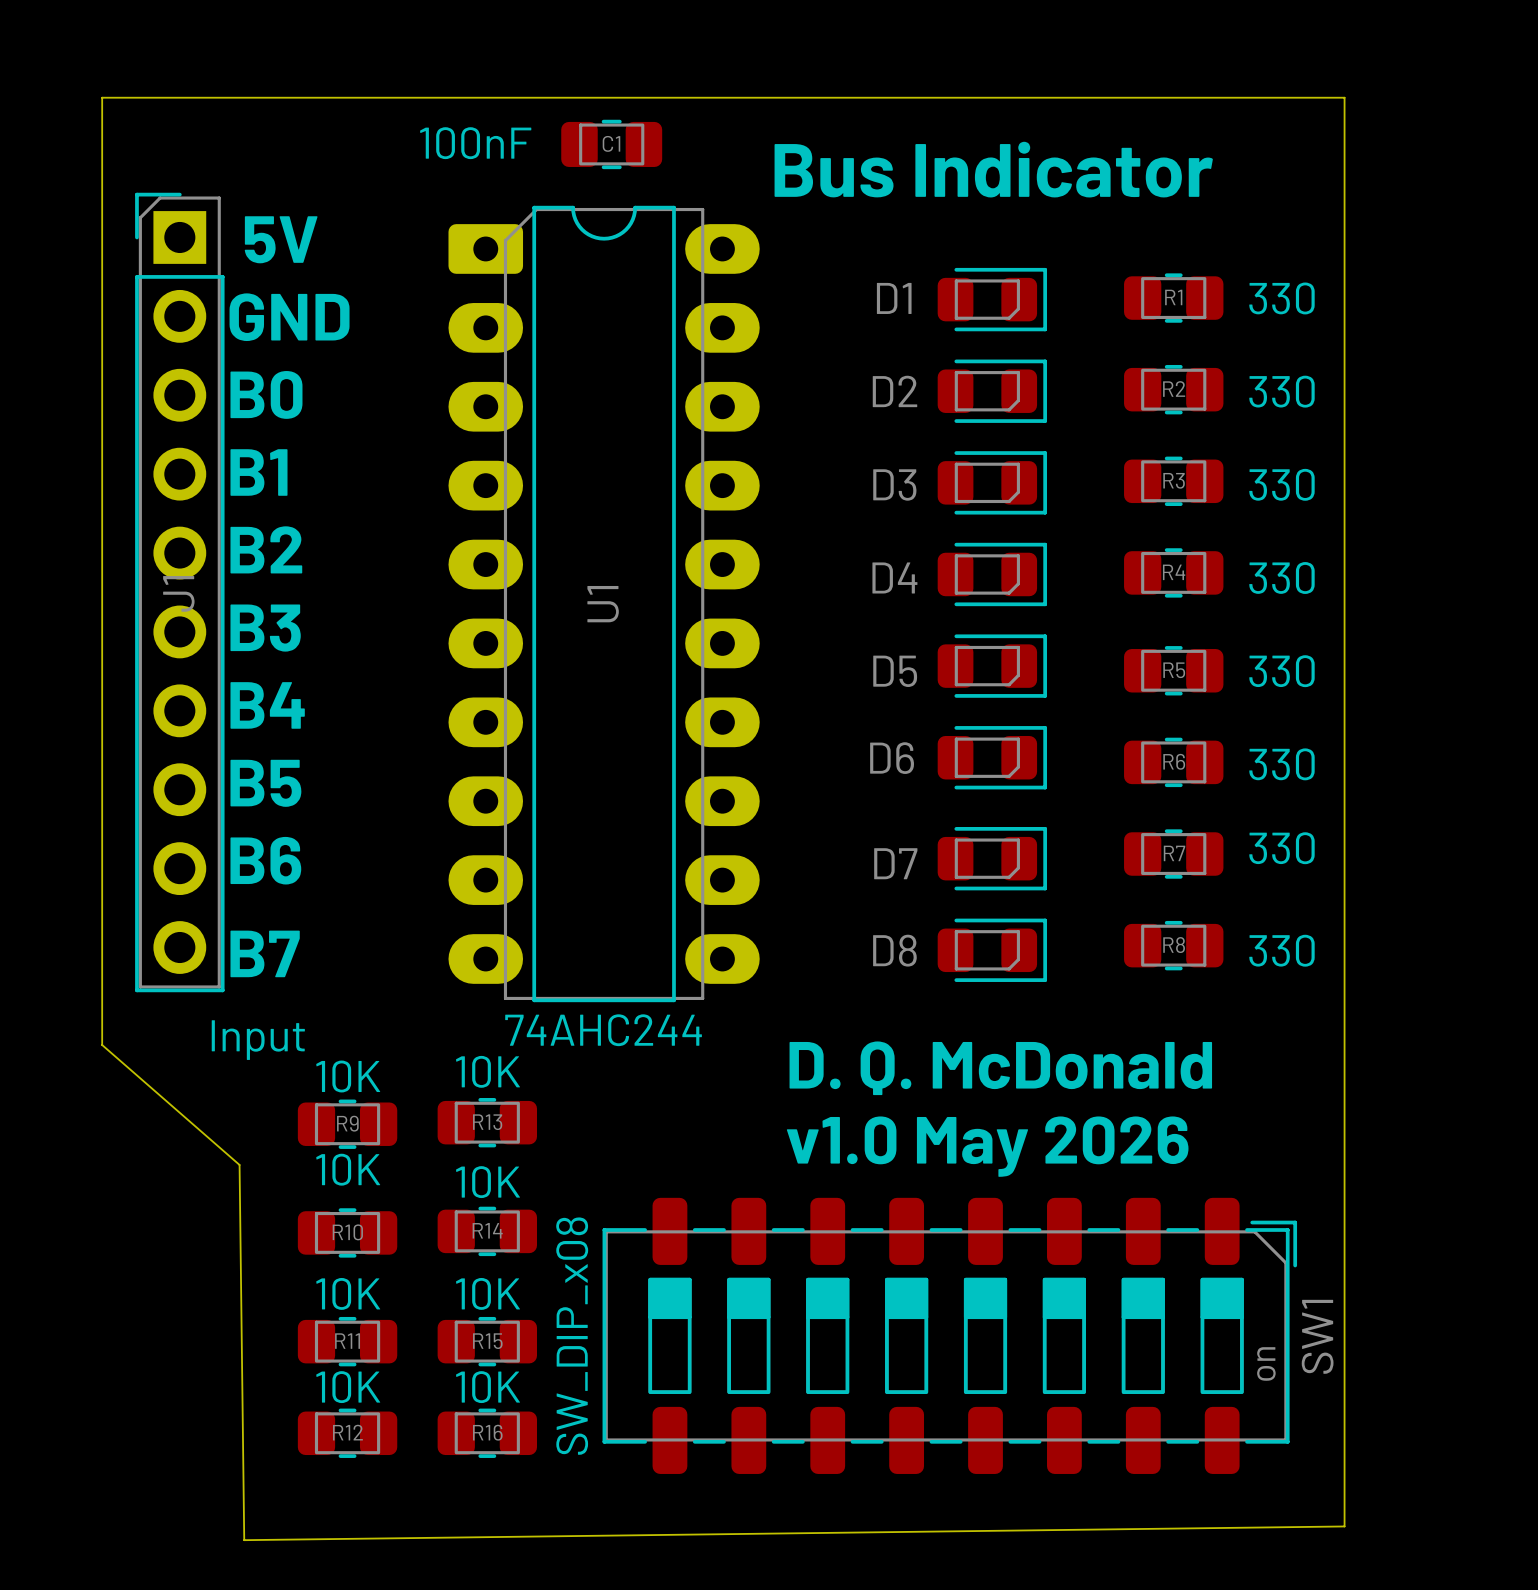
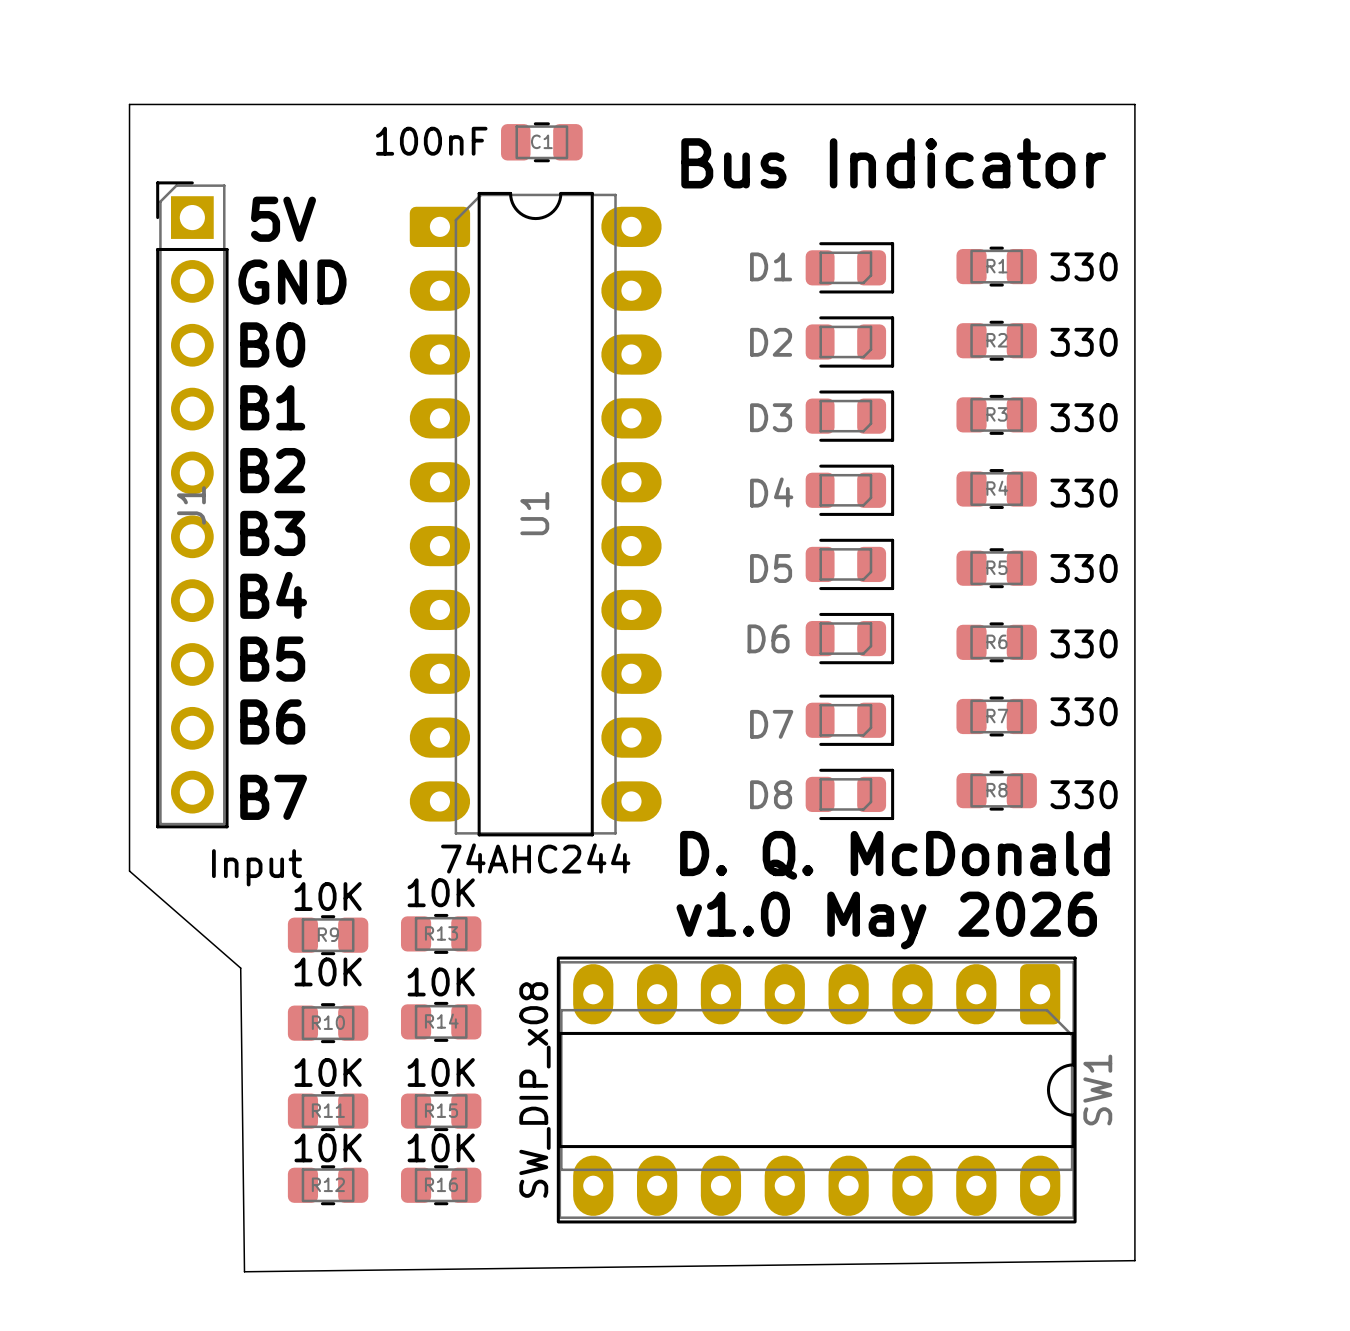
text position: D. Q. McDonald (1000, 1068) -> D. Q. McDonald (894, 855)
text position: v1.0 May 2026 (987, 1146) -> v1.0 May 2026 (886, 920)
SW1 footprint: [602, 1197, 1298, 1474] -> [556, 956, 1077, 1224]

